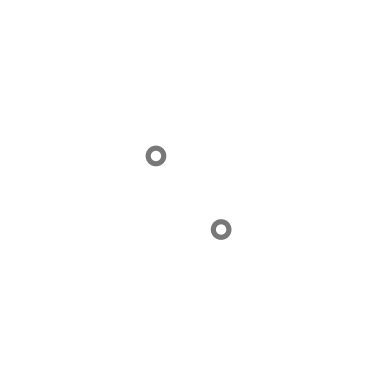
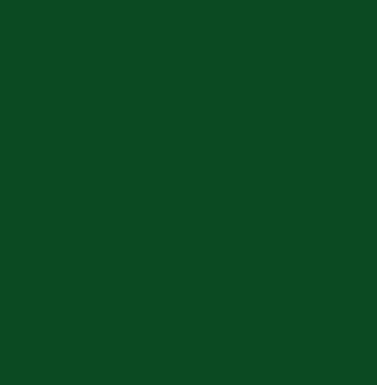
via: (155, 155) -> none
via: (221, 229) -> none

